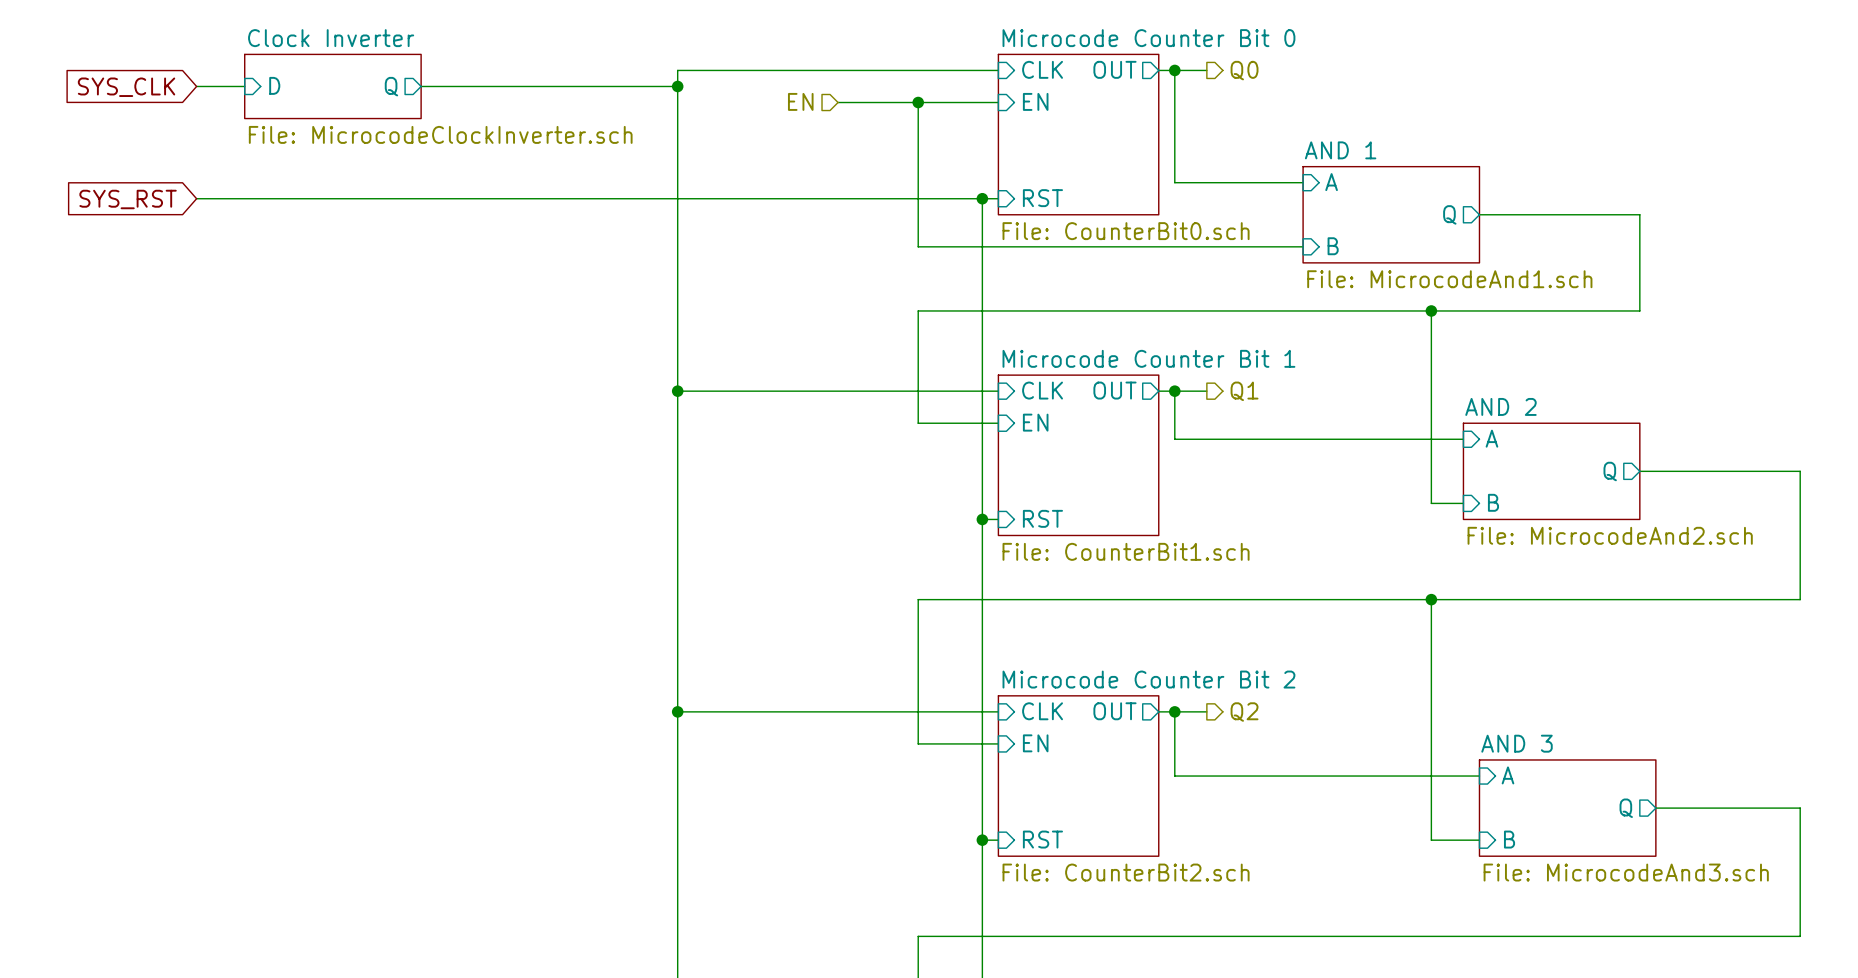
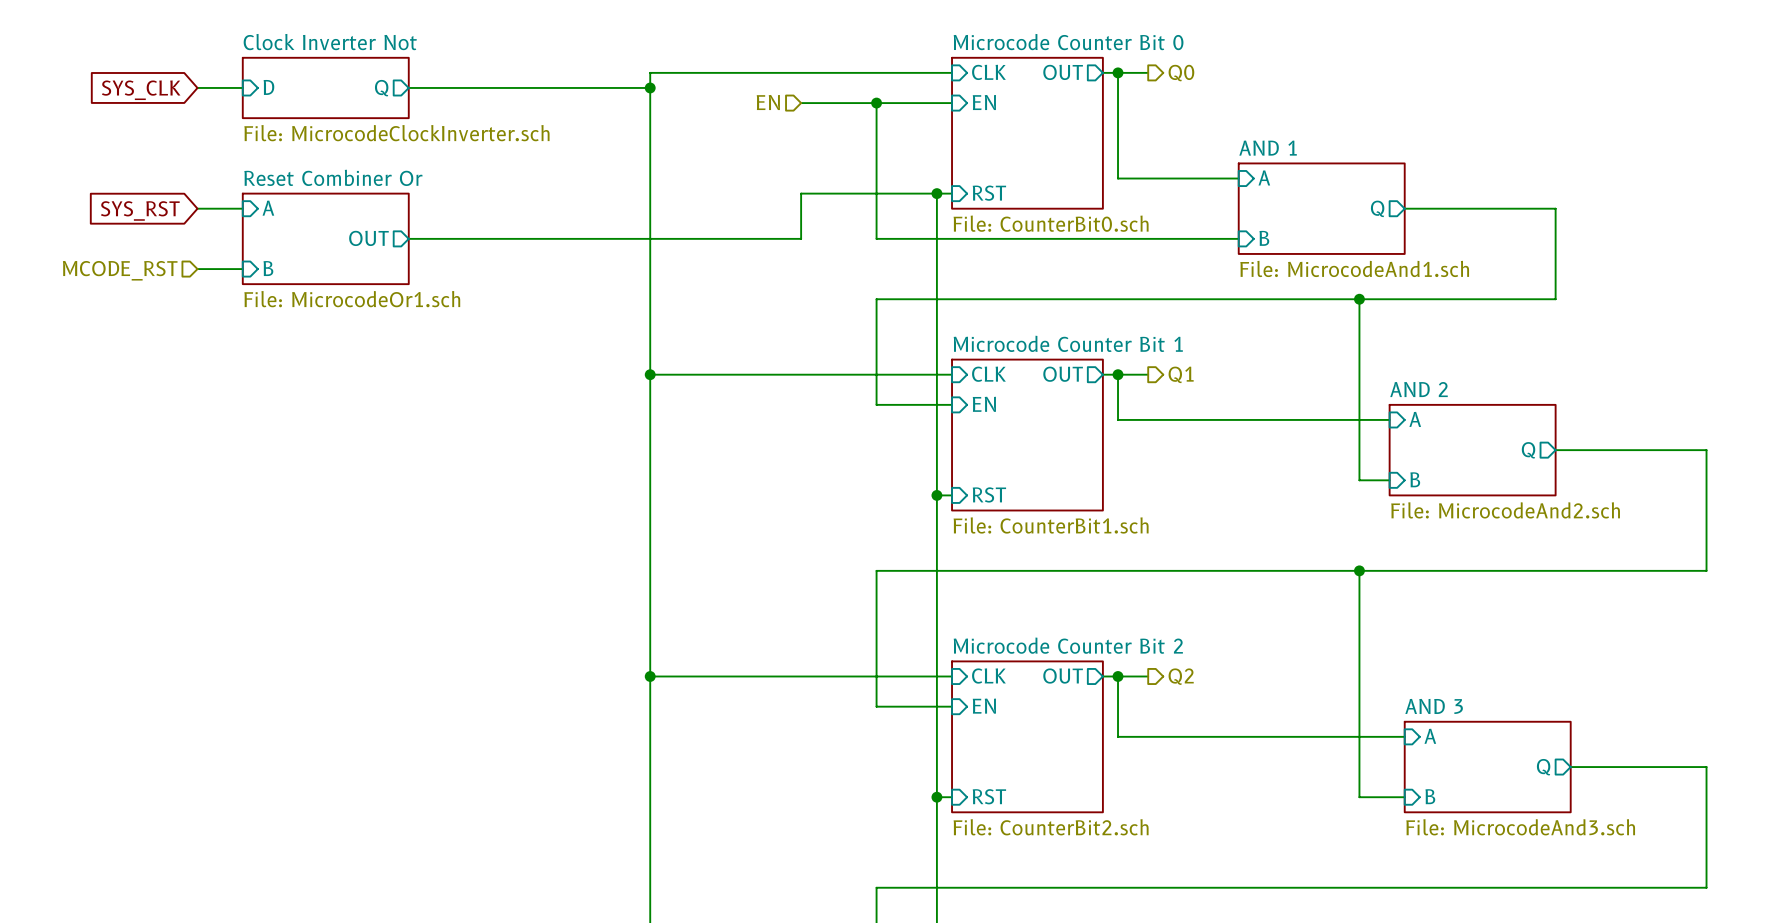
sheet Clock Inverter name: Clock Inverter (331, 38) -> Clock Inverter Not (330, 42)
wire: (196, 198) (838, 198) -> (408, 238) (801, 238) (801, 193)
global label position: SYS_RST (128, 199) -> SYS_RST (140, 210)
wire: none -> (197, 208) (242, 208)
sheet pin: none -> A (268, 208)
sheet Reset Combiner Or: none -> File: MicrocodeOr1.sch (325, 238)
sheet pin: none -> OUT (368, 238)
wire: none -> (197, 269) (242, 269)
sheet pin: none -> B (268, 268)
hierarchical label: none -> MCODE_RST (120, 270)

